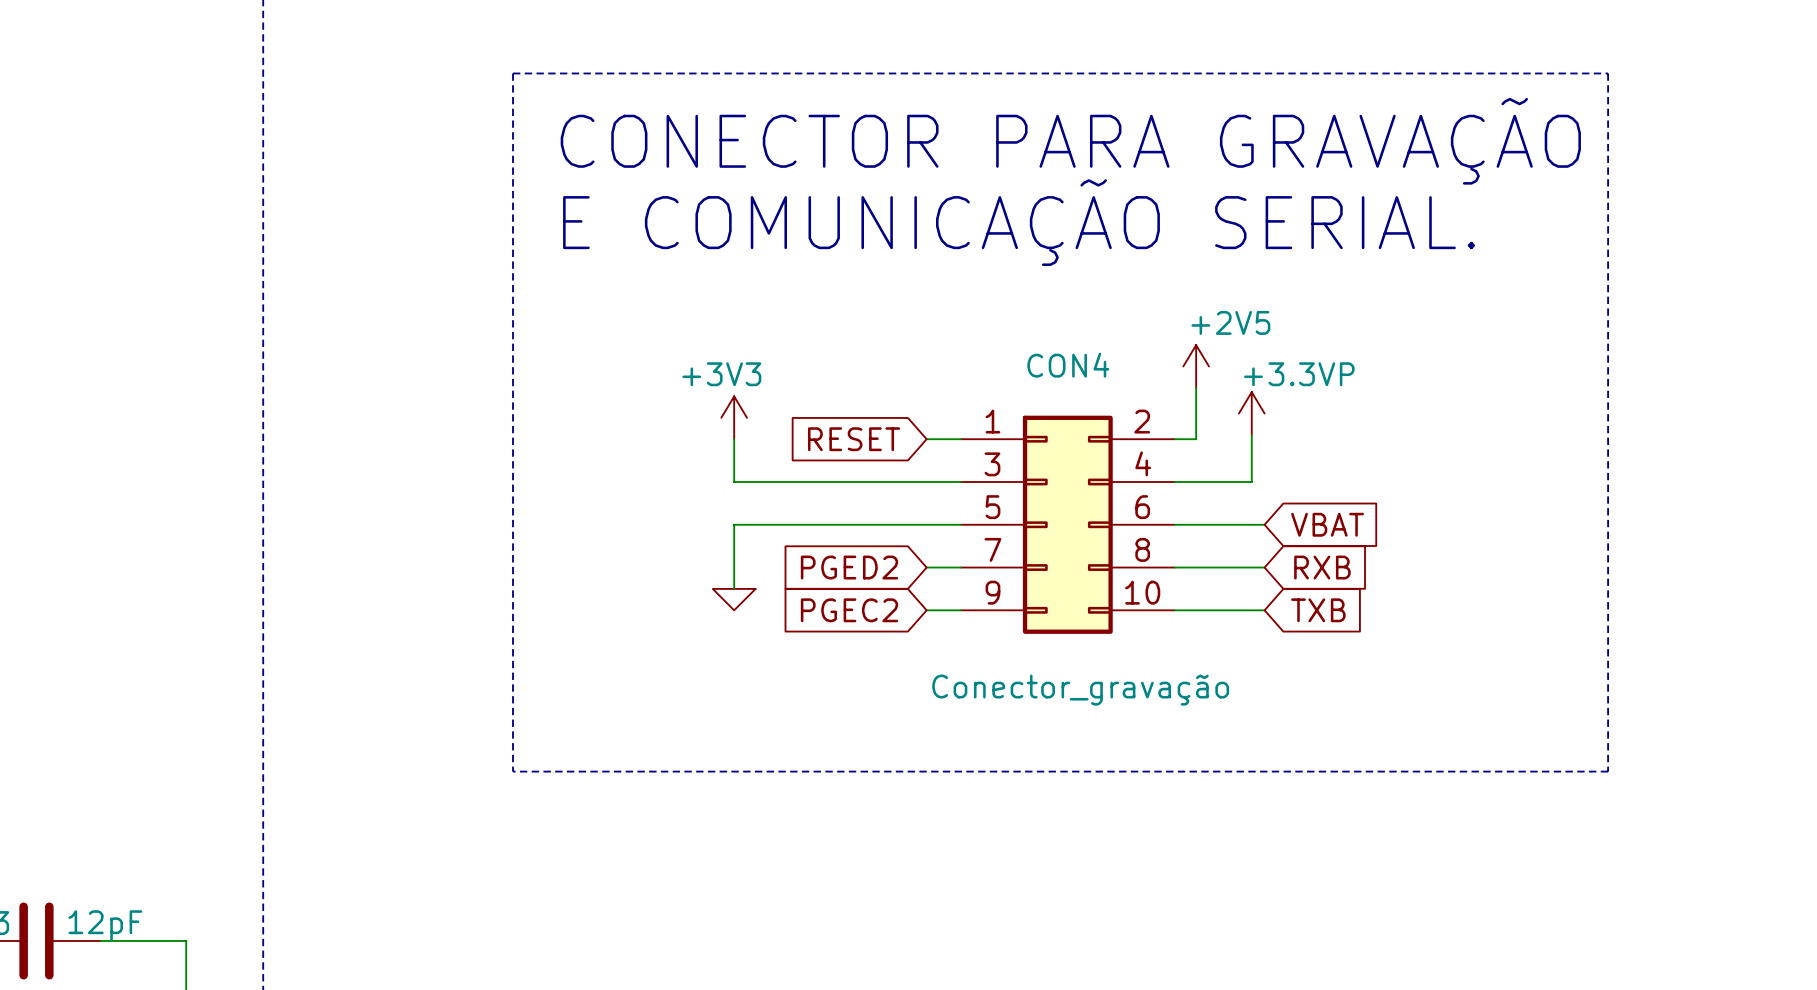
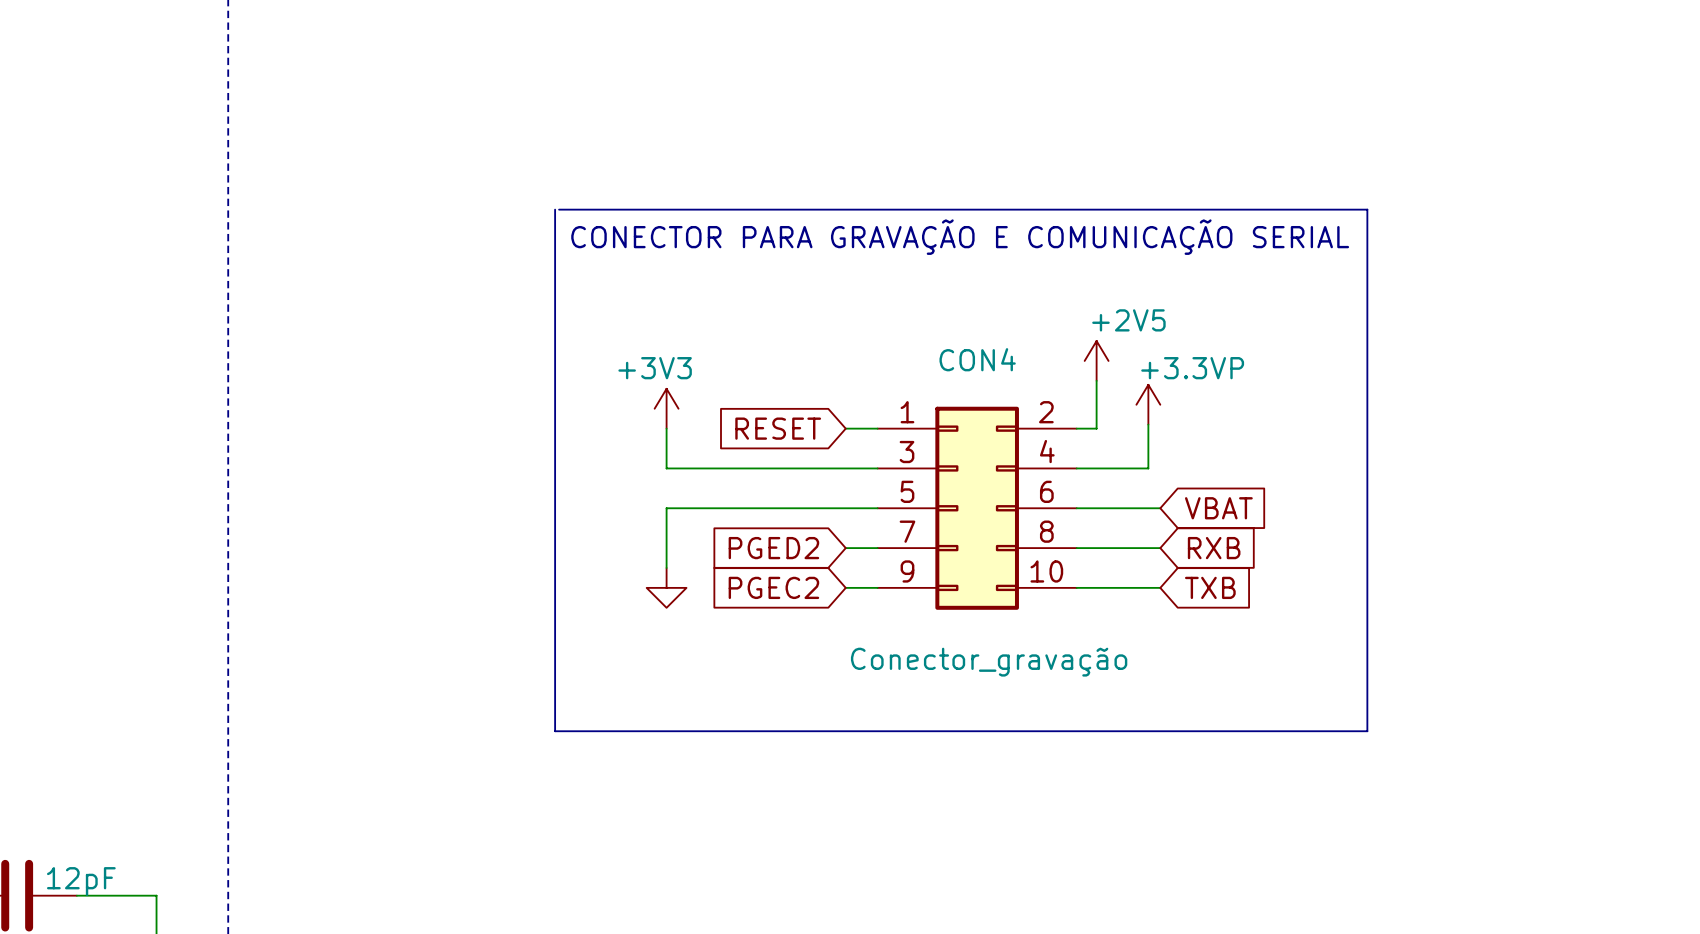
line: (513, 73) (513, 771) (1608, 771) (1608, 73) (513, 73) -> none
text: CONECTOR PARA GRAVAÇÃO (1070, 141) -> none
line: none -> (555, 209) (555, 731) (1367, 731) (1367, 209) (559, 209)
text: E COMUNICAÇÃO SERIAL. (1019, 222) -> CONECTOR PARA GRAVAÇÃO E COMUNICAÇÃO SERIAL (960, 237)
power symbol shape: [712, 588, 756, 611] -> [646, 567, 687, 608]

